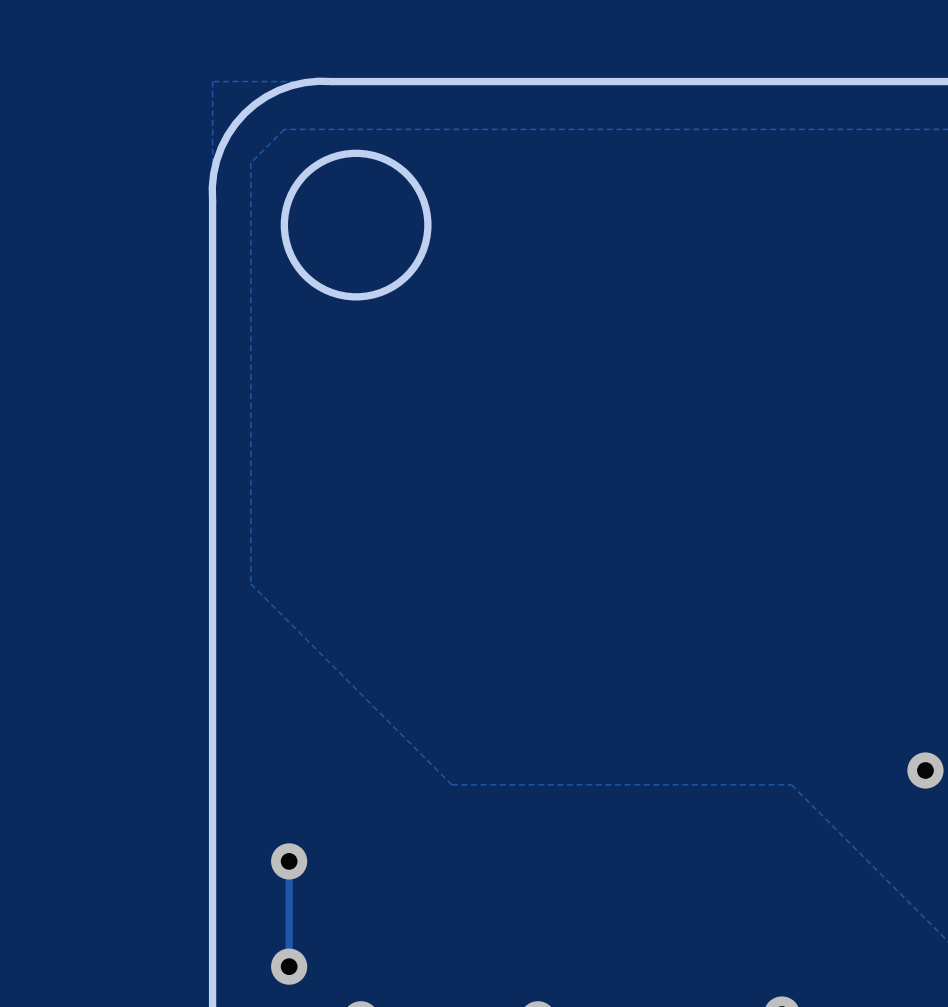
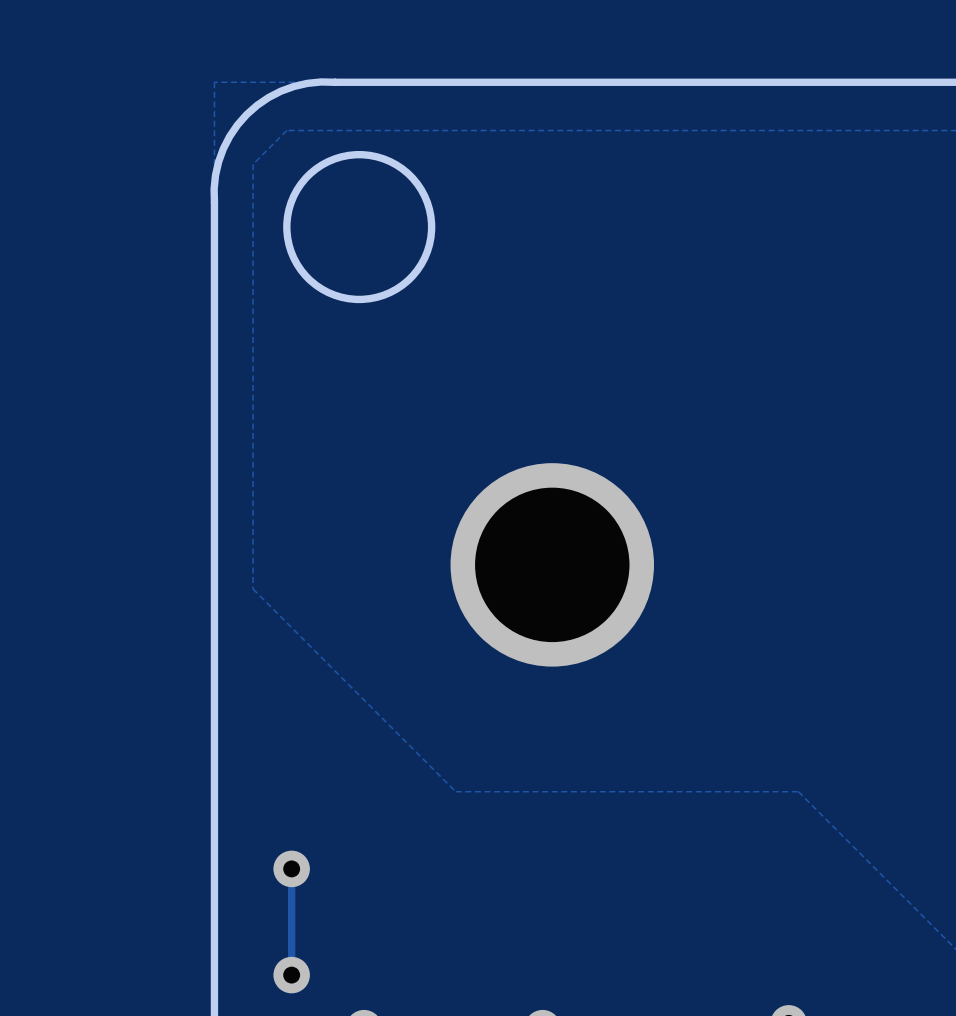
via: none -> (552, 564)
via: (925, 770) -> none

